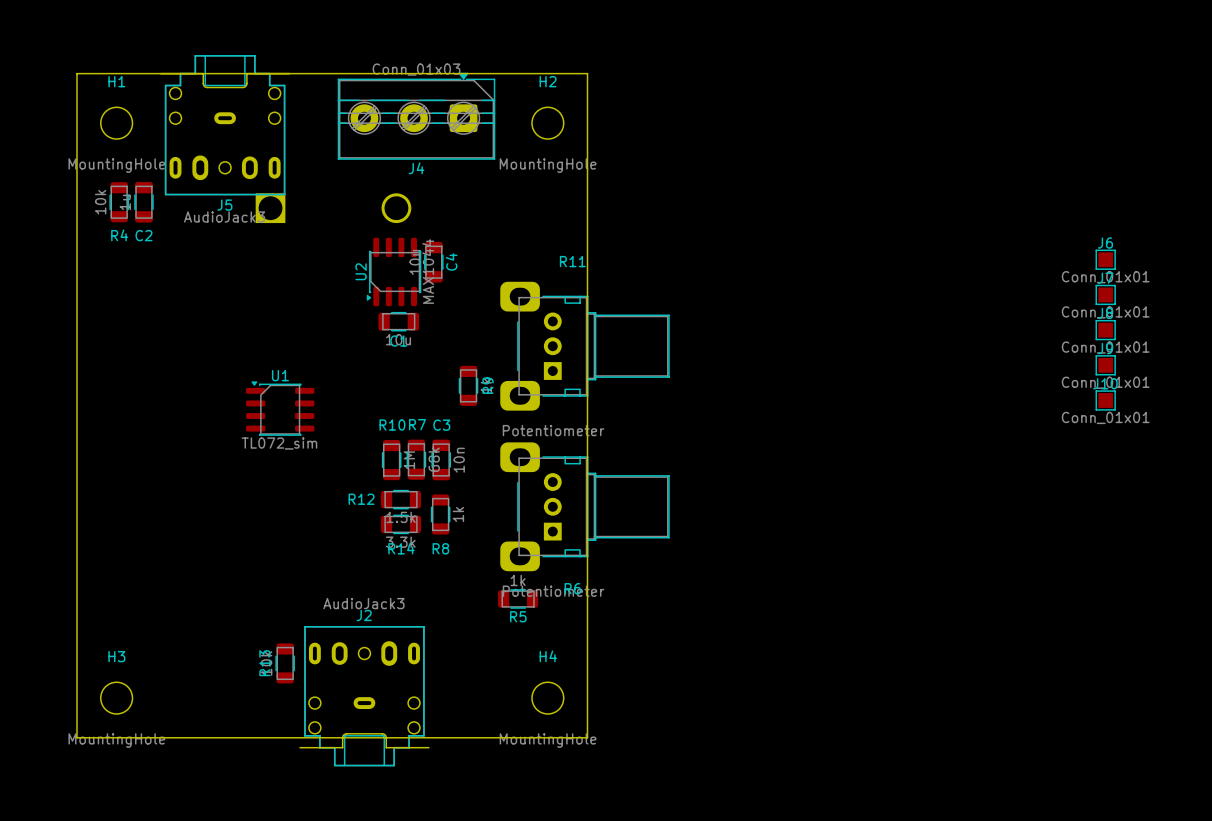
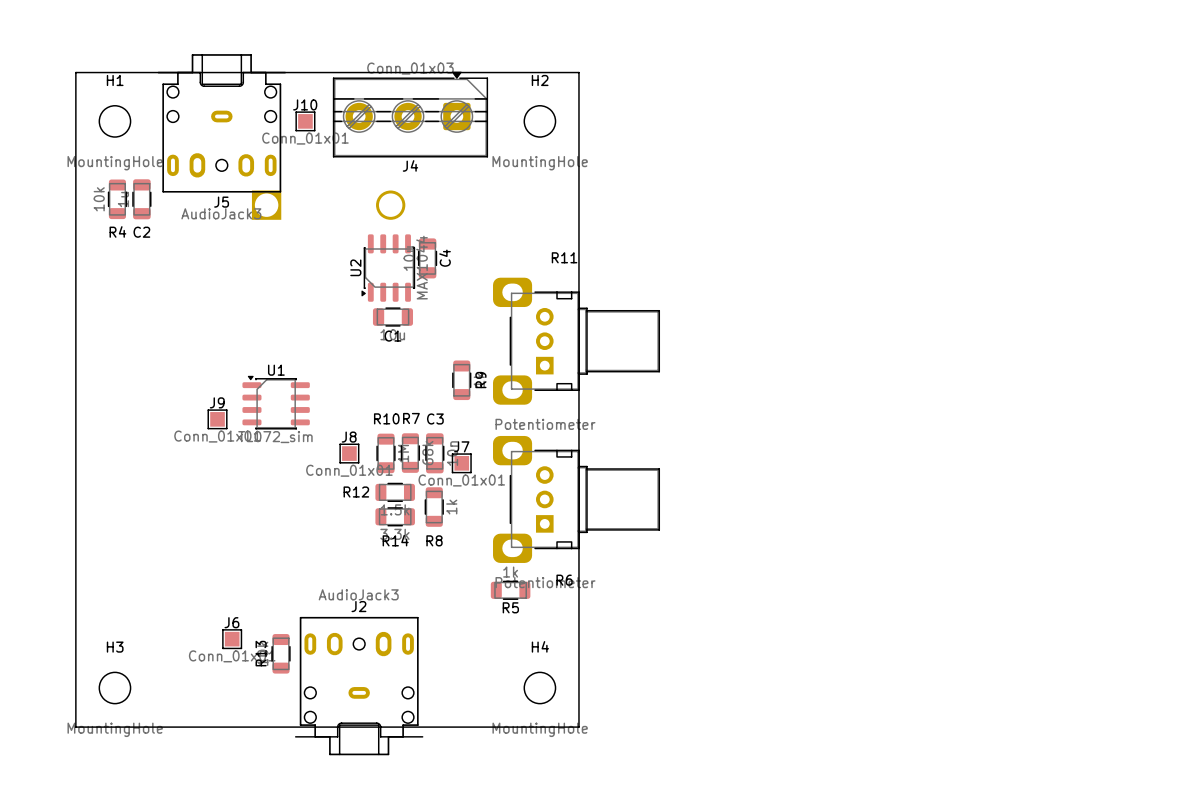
J6 position: (1105, 259) -> (232, 639)
J7 position: (1105, 294) -> (461, 463)
J8 position: (1105, 330) -> (349, 453)
J9 position: (1105, 365) -> (217, 419)
J10 position: (1105, 400) -> (305, 121)

